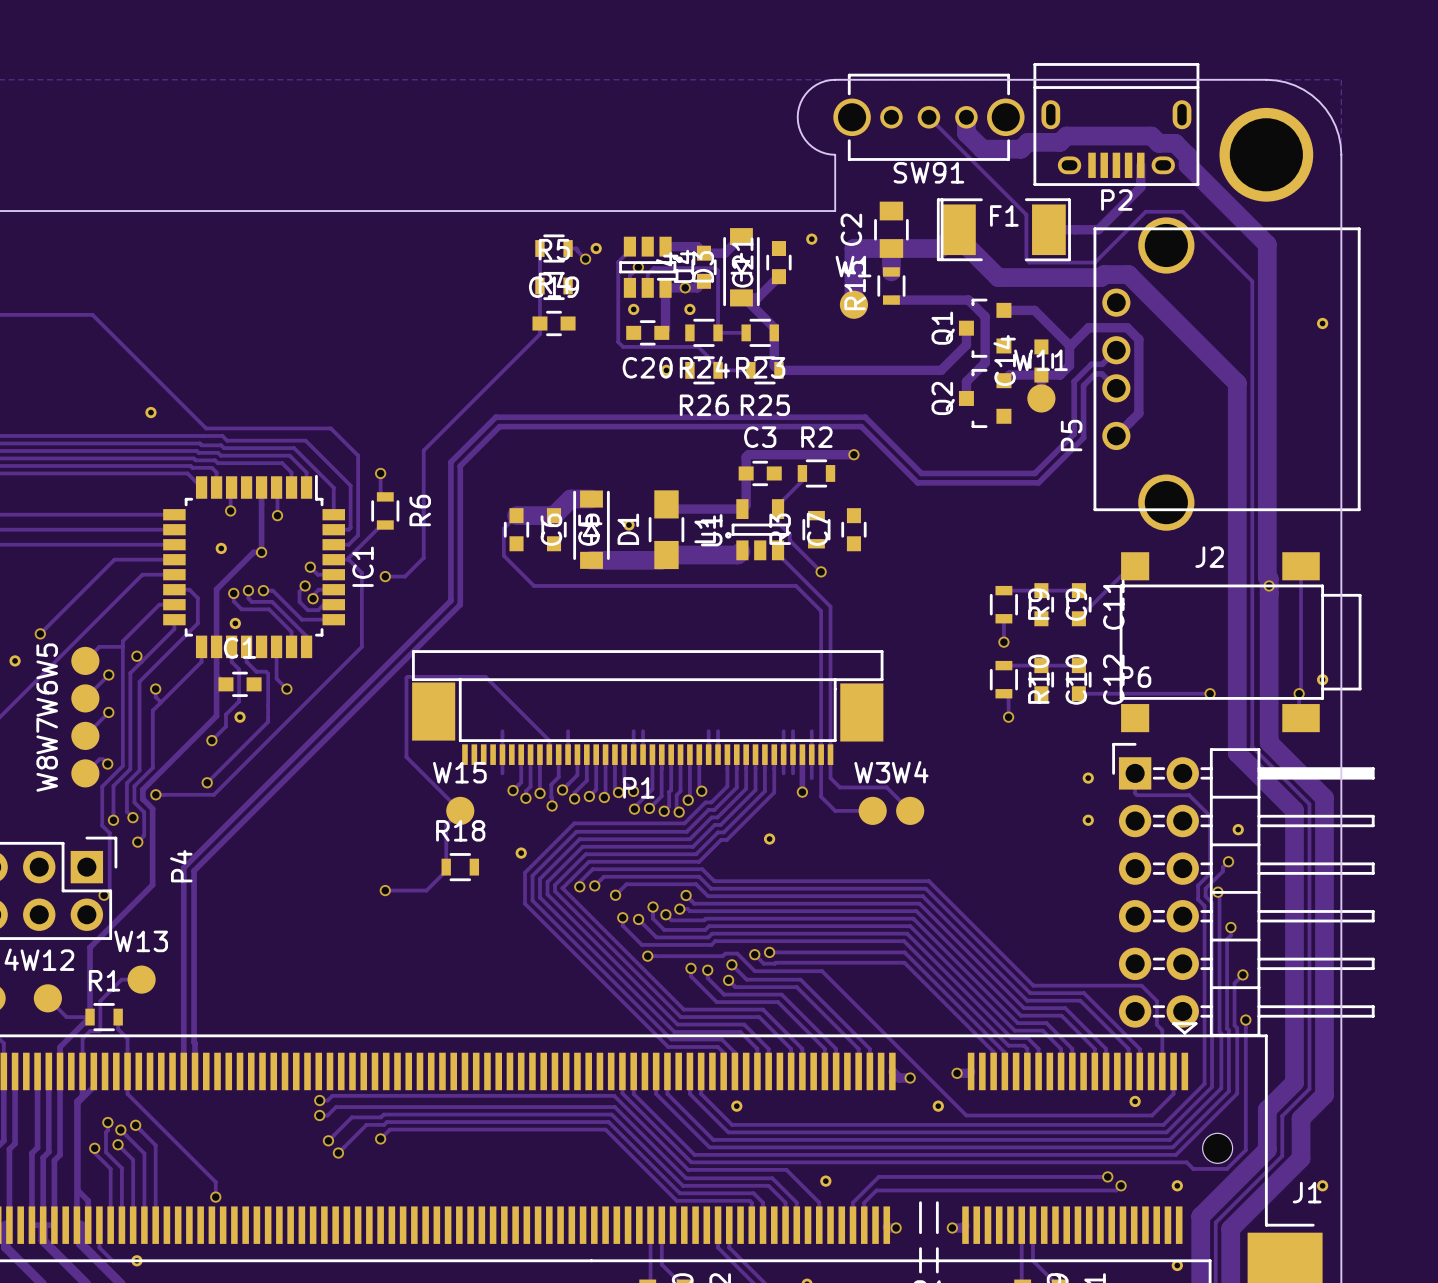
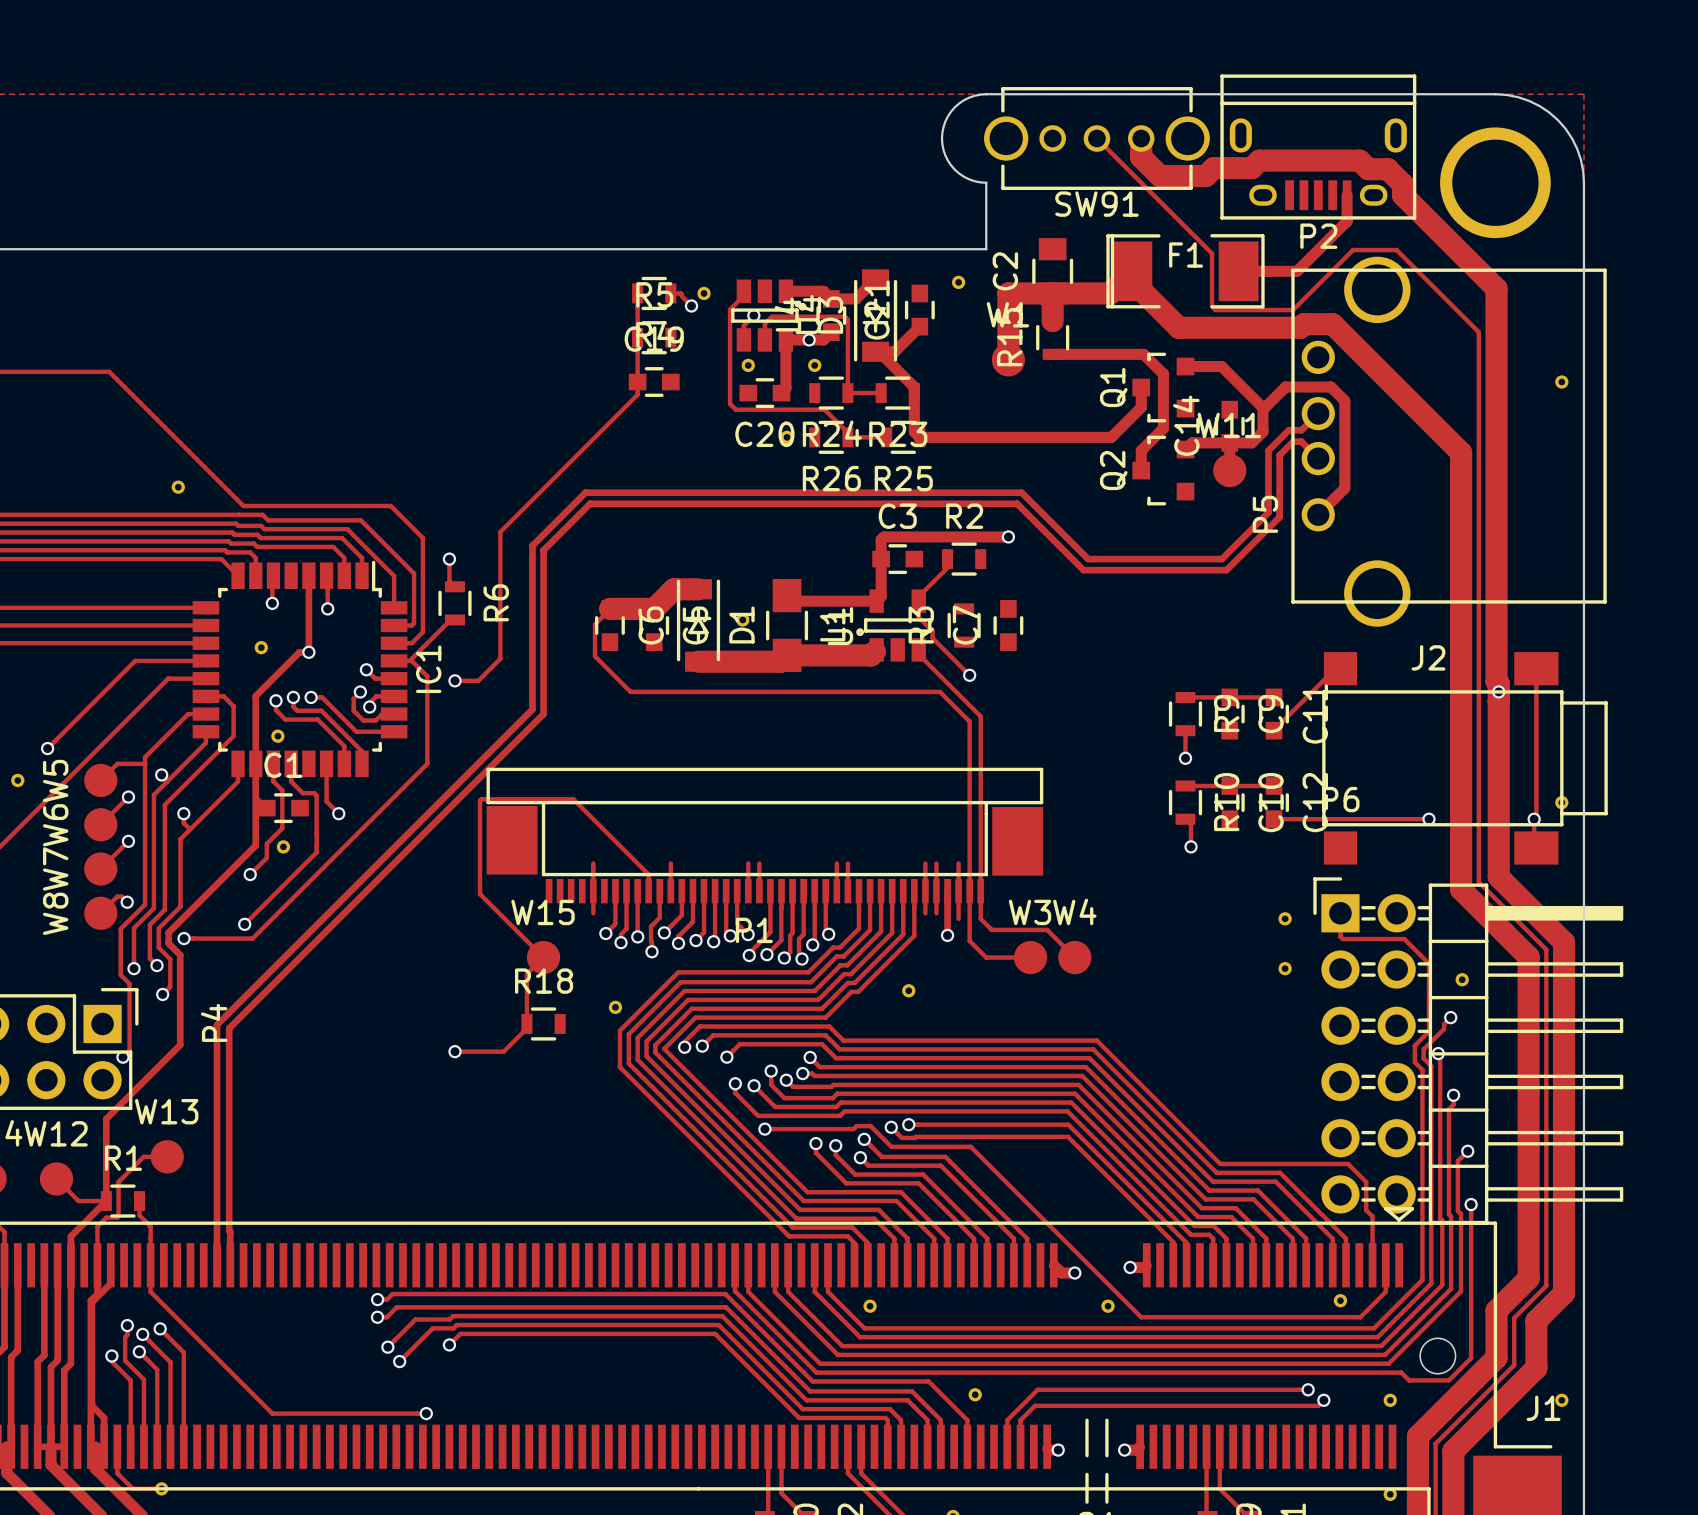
track: (215, 1182) (215, 1197) -> (254, 1395) (272, 1413) (426, 1413)
via: (215, 1197) -> none
via: none -> (426, 1413)

